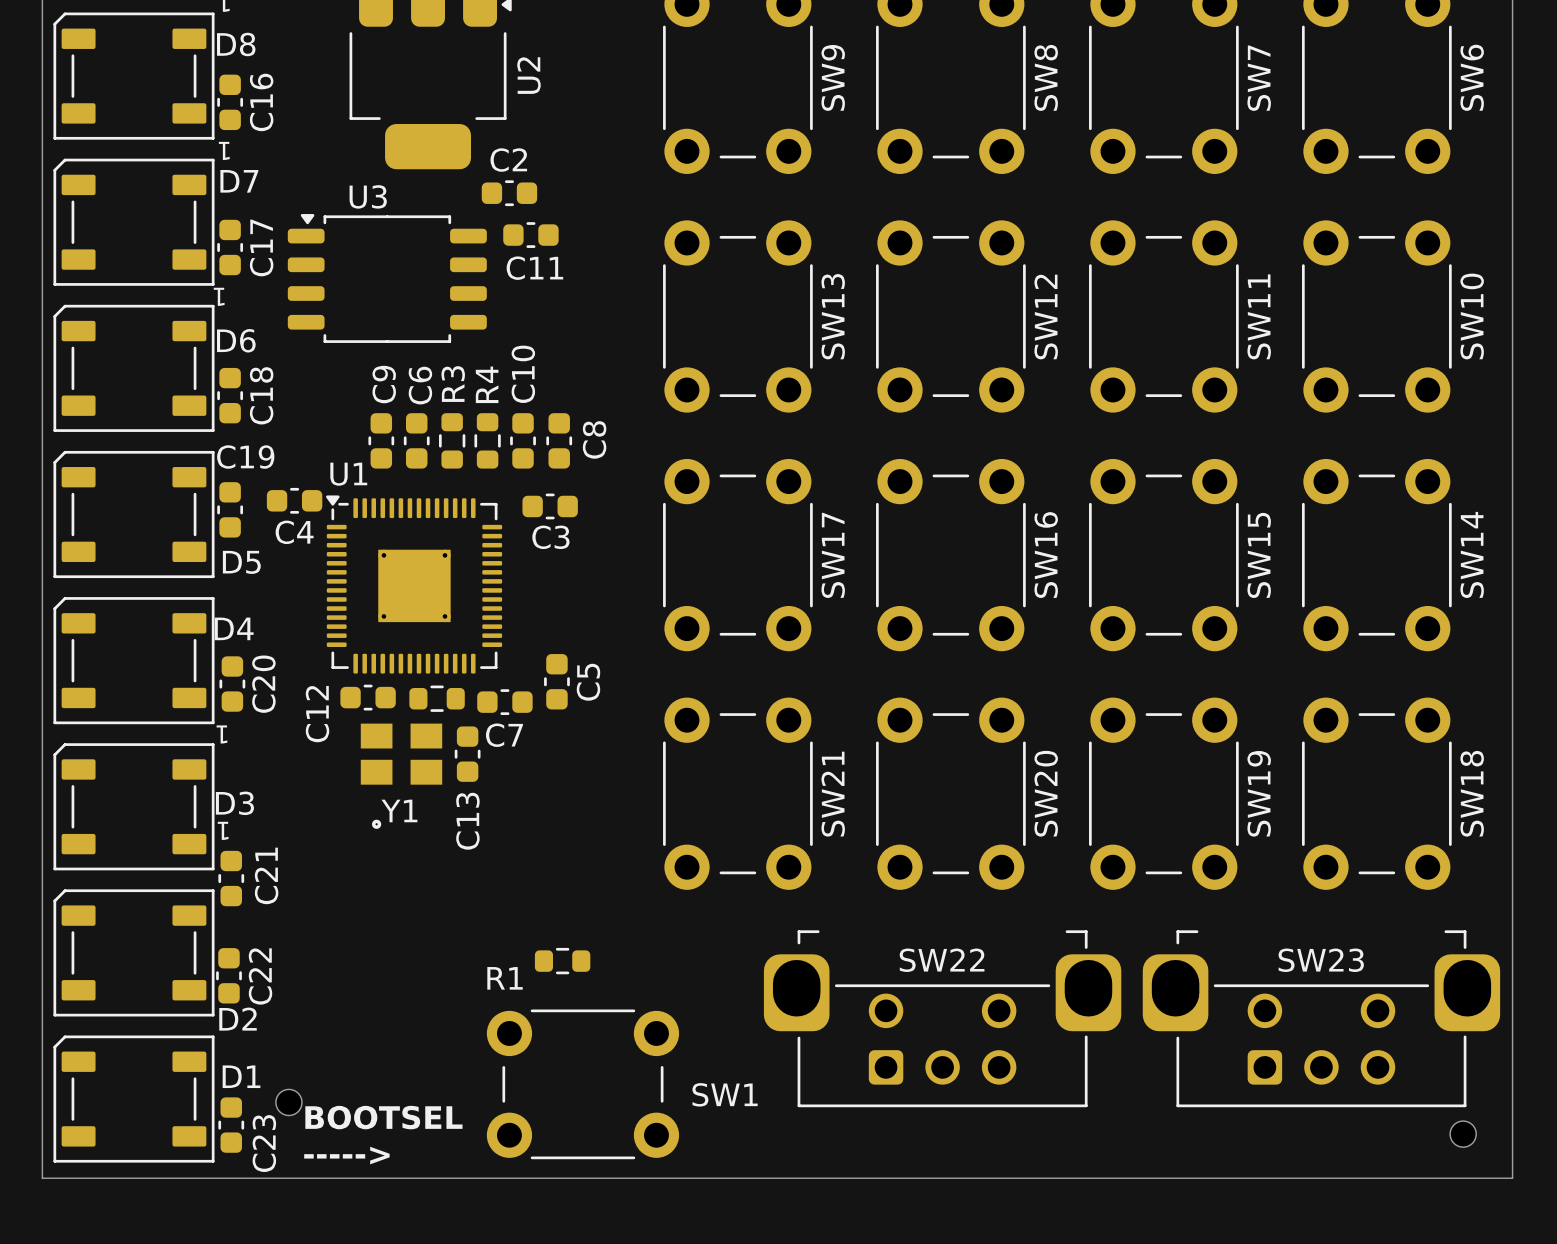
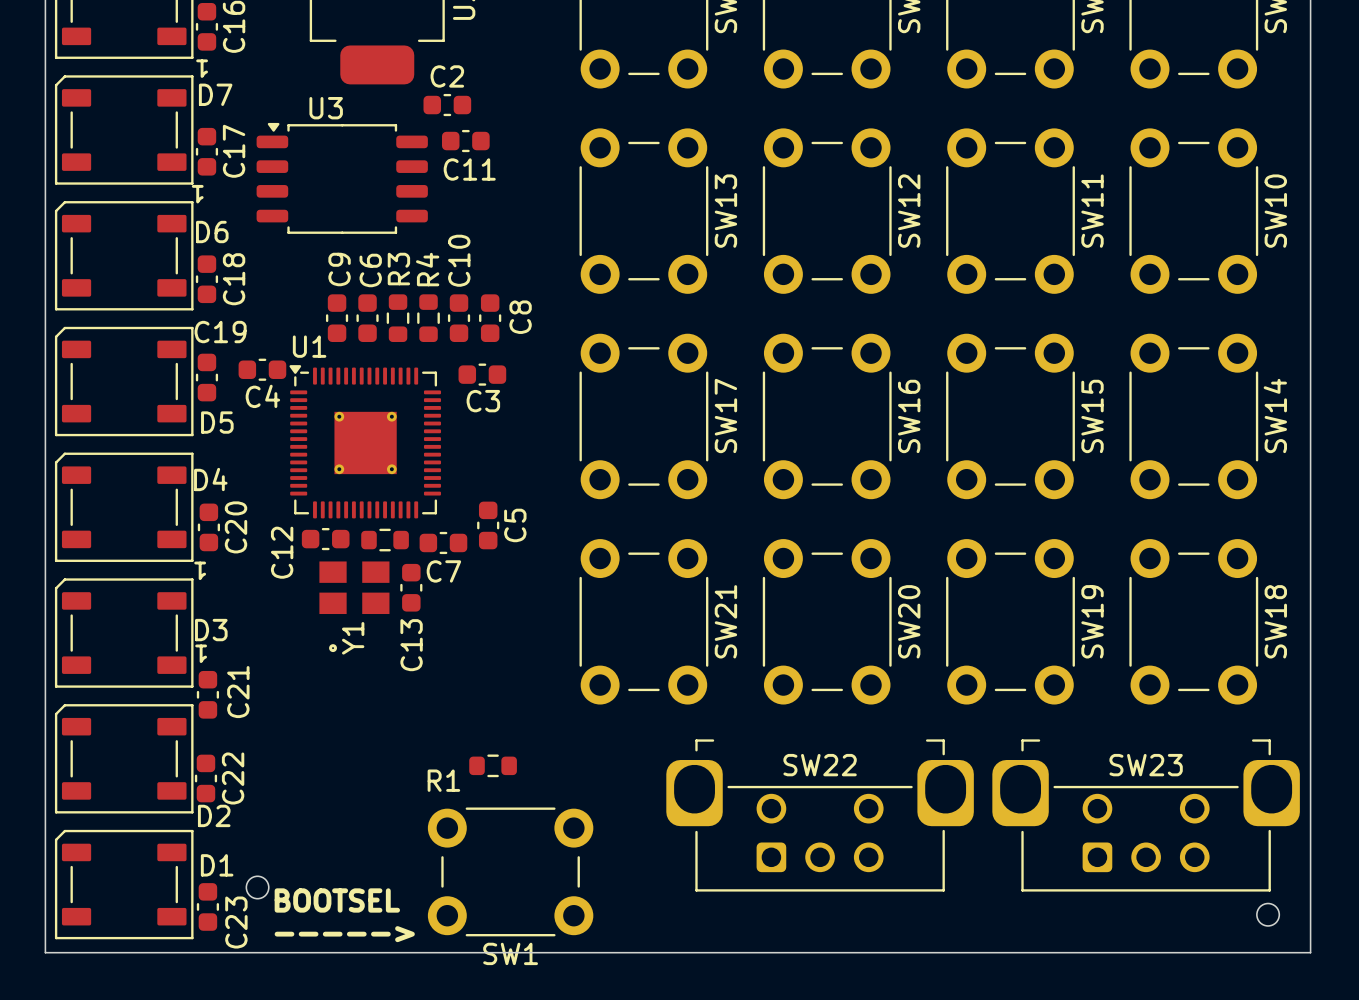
Y1 name rotation: 0° (399, 810) -> 90° counterclockwise (353, 638)
SW1 name position: SW1 (725, 1094) -> SW1 (510, 953)

